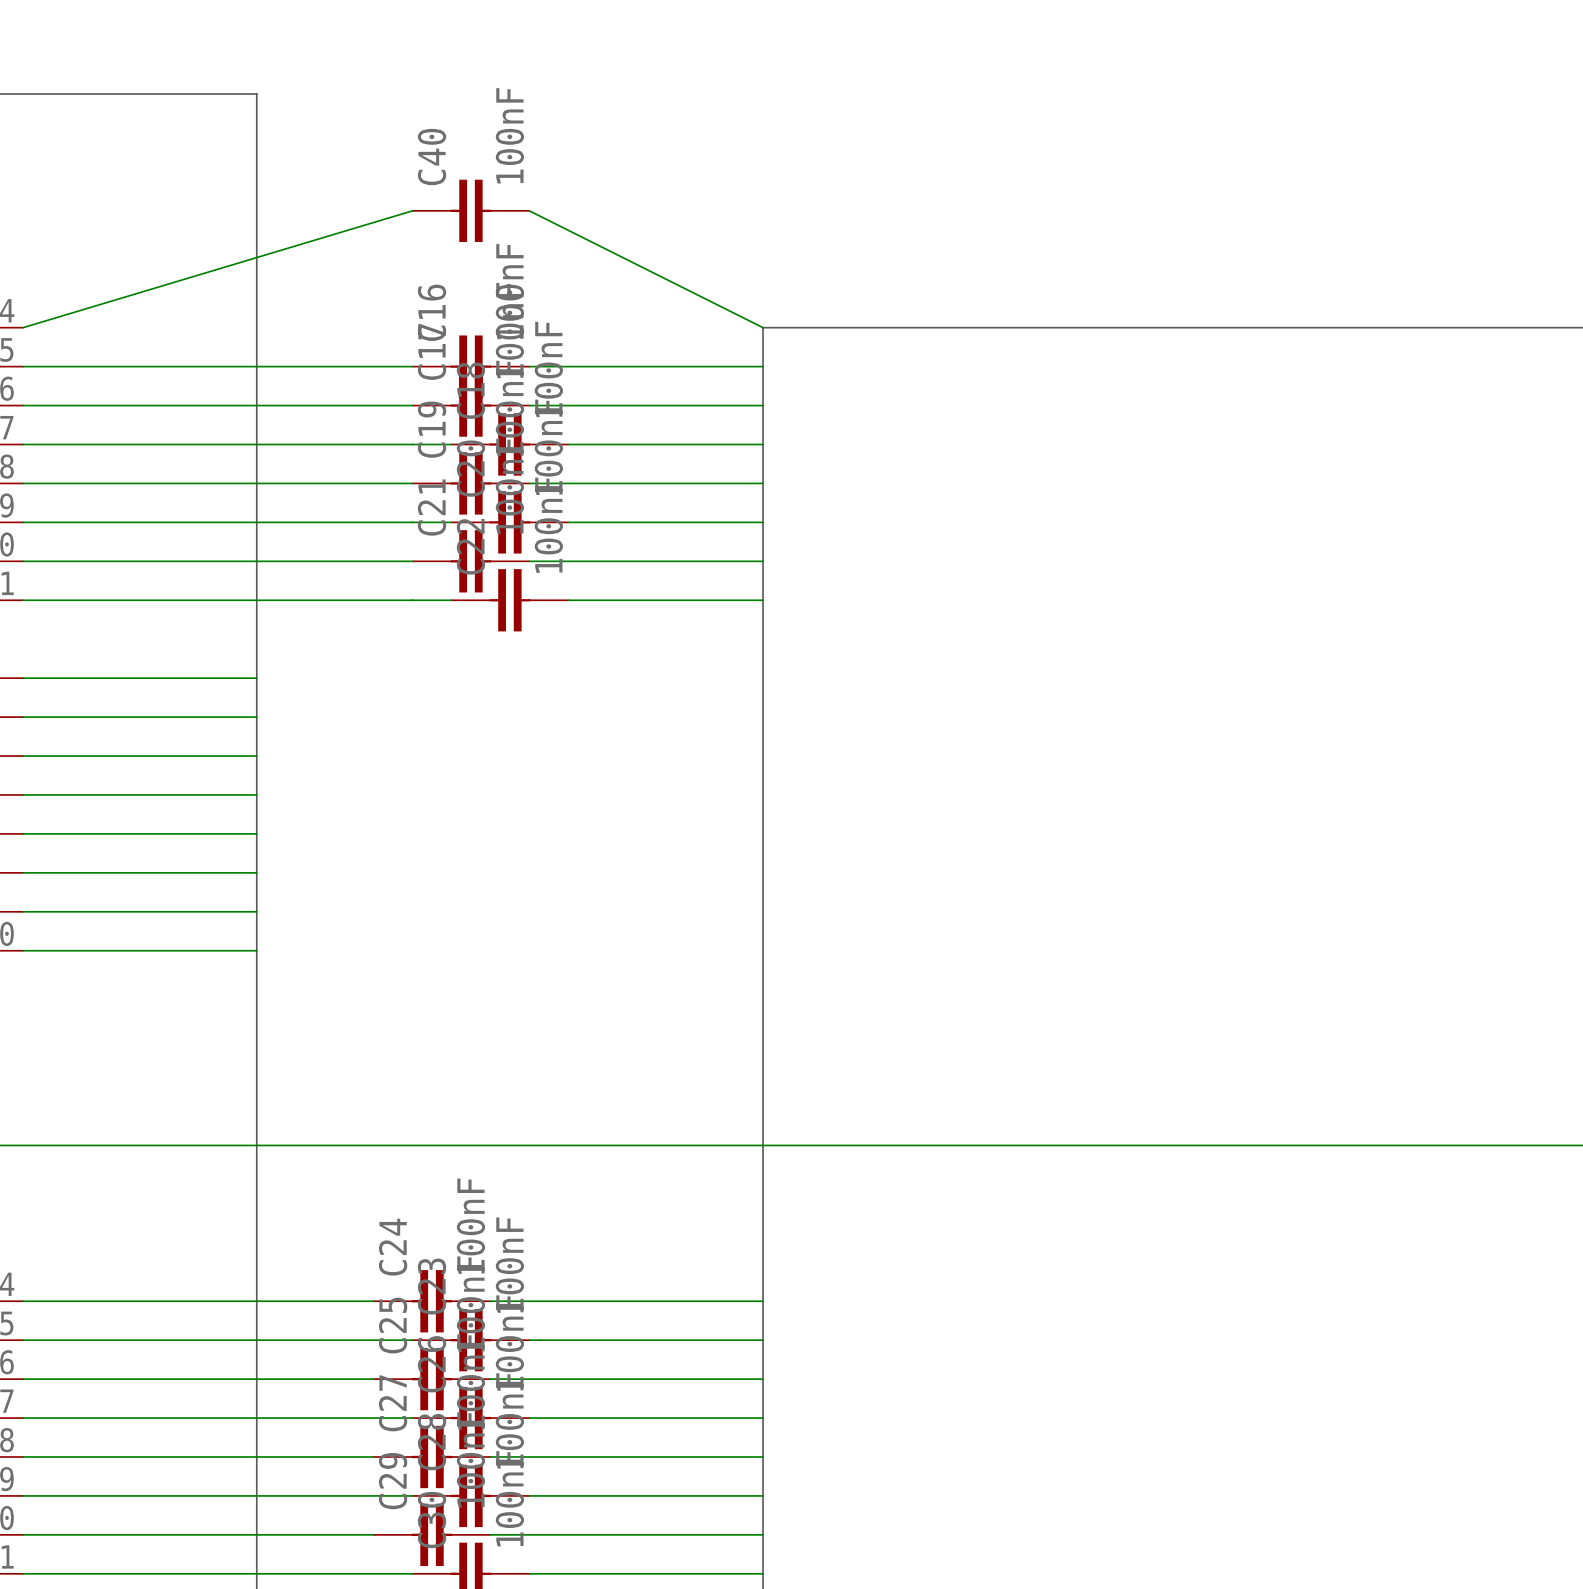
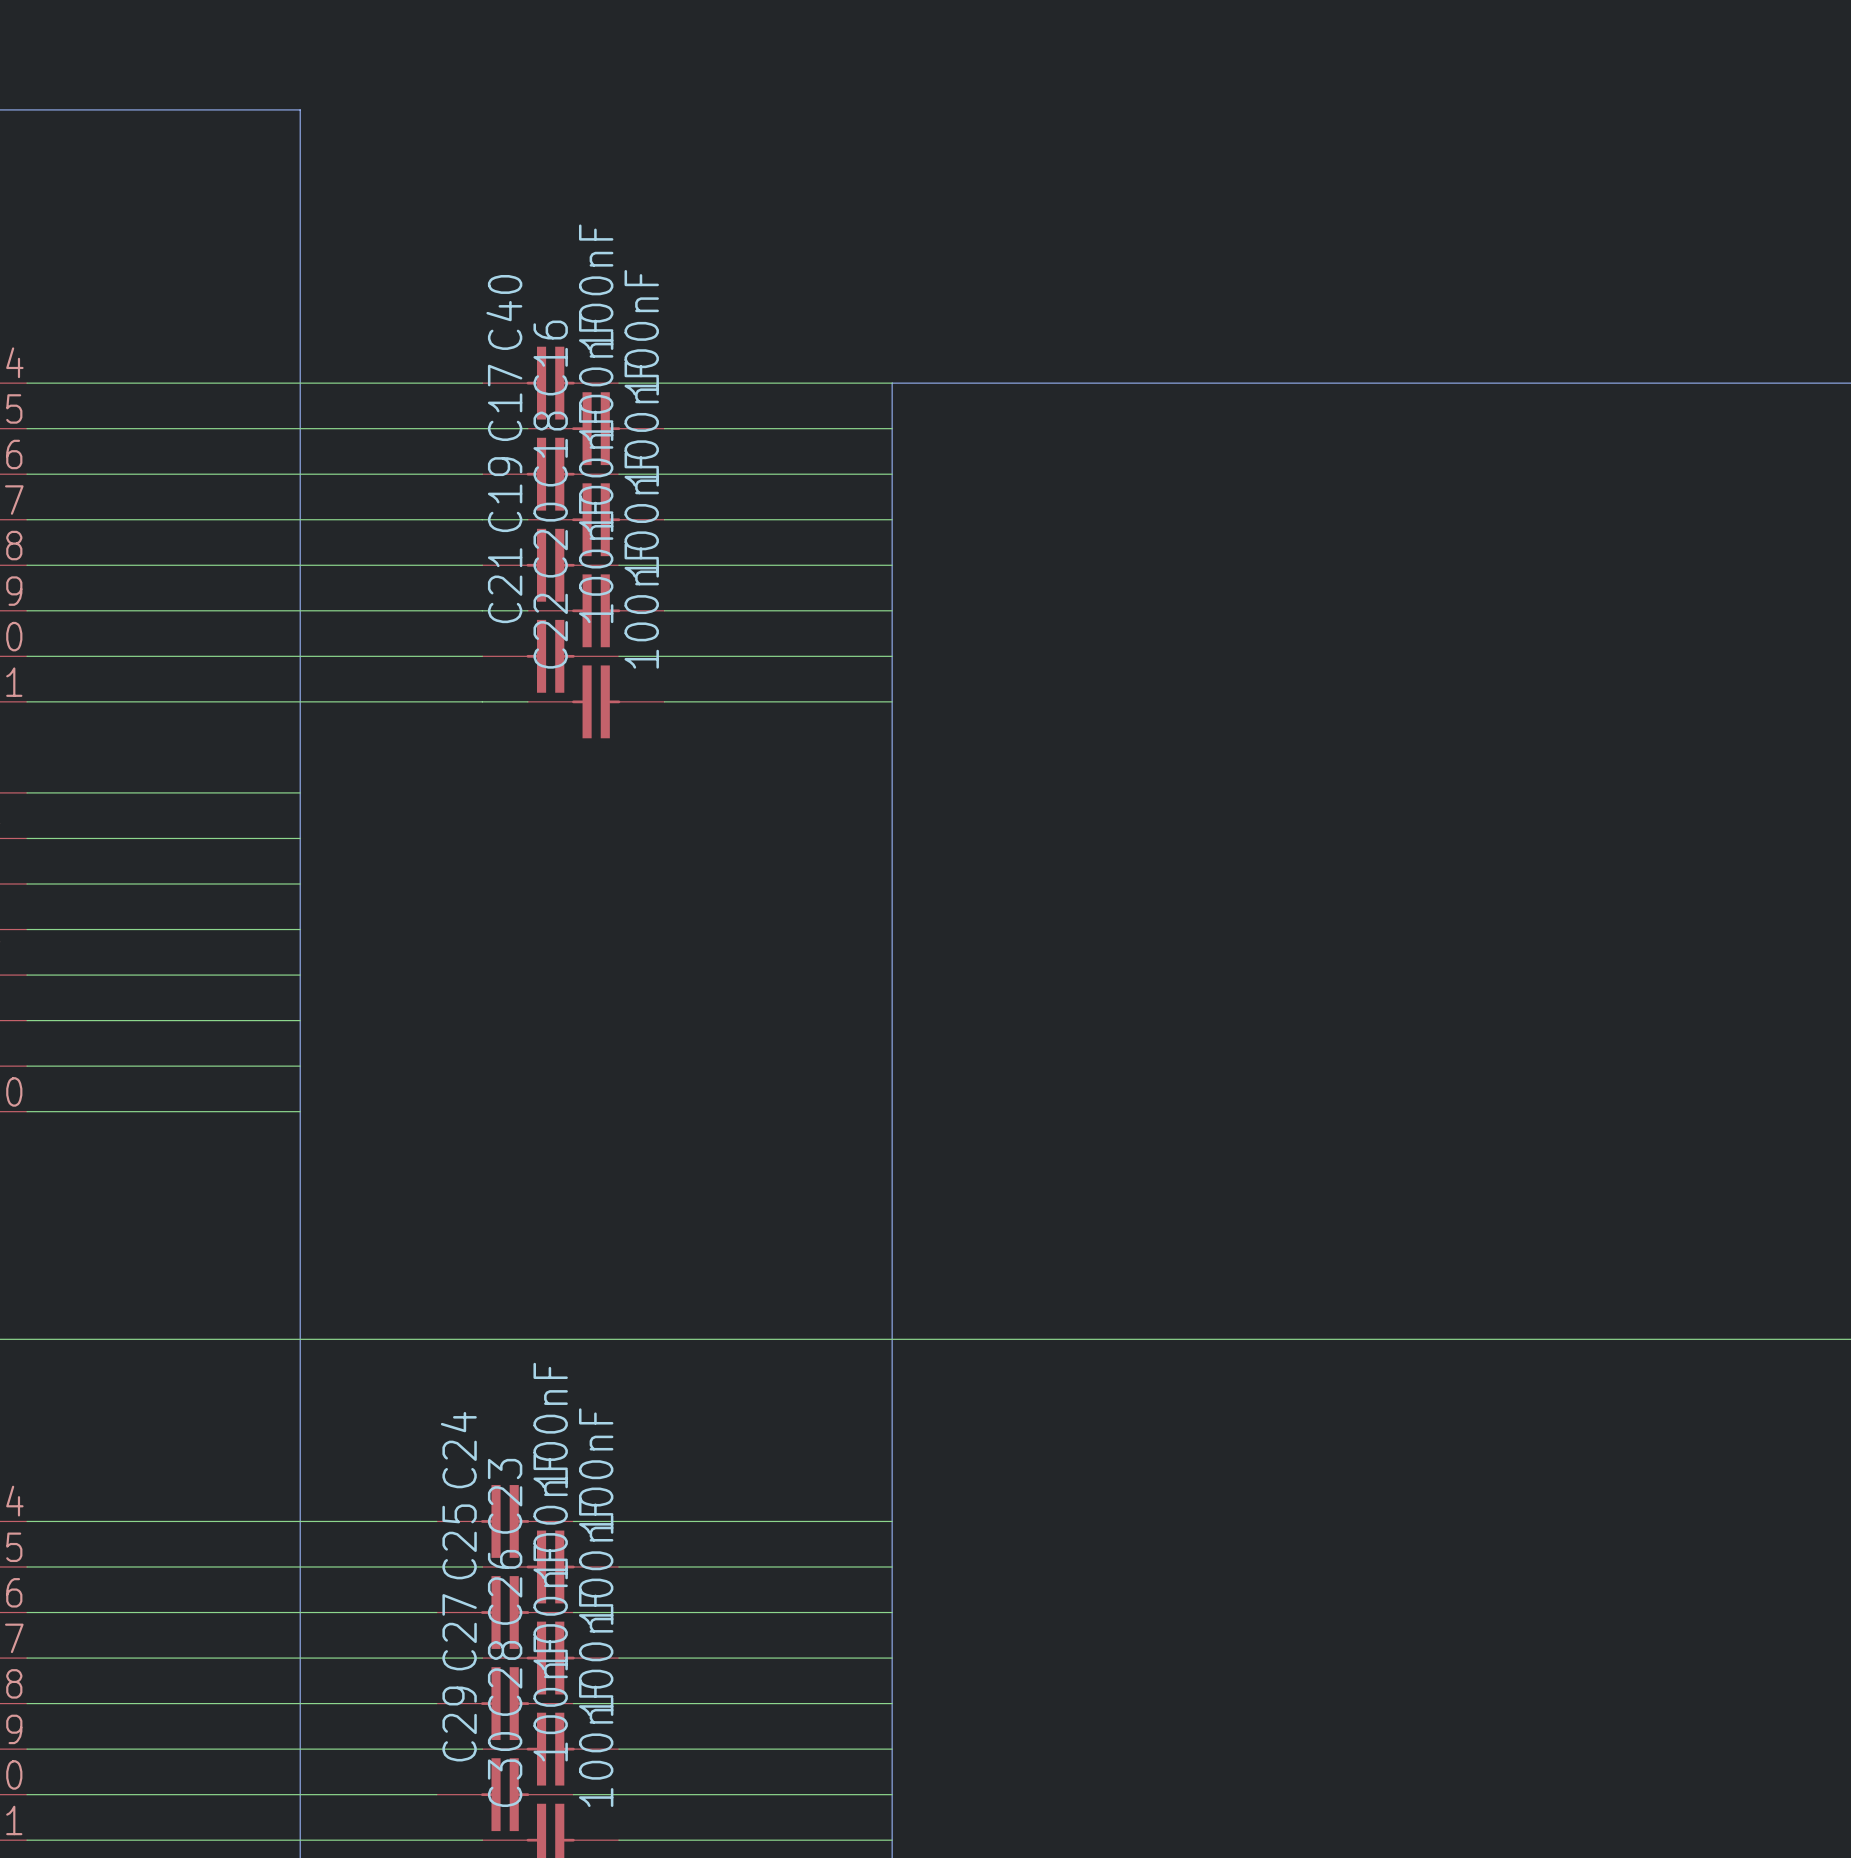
wire: (412, 210) (23, 327) -> (482, 383) (27, 383)
C40 position: (470, 210) -> (550, 383)
wire: (529, 210) (763, 327) -> (618, 383) (892, 383)
C16 position: (470, 366) -> (596, 428)

